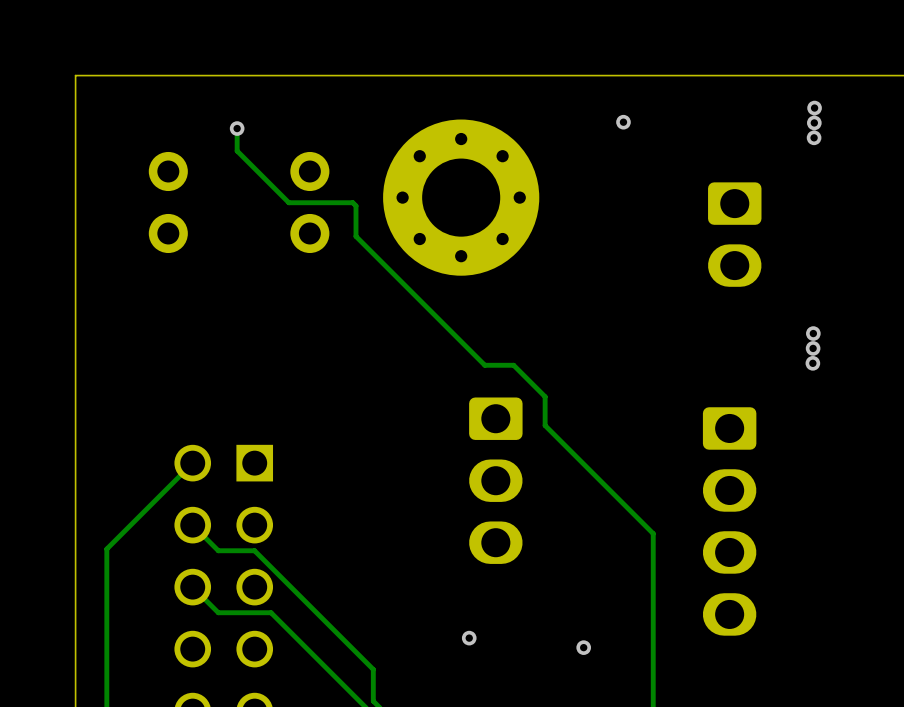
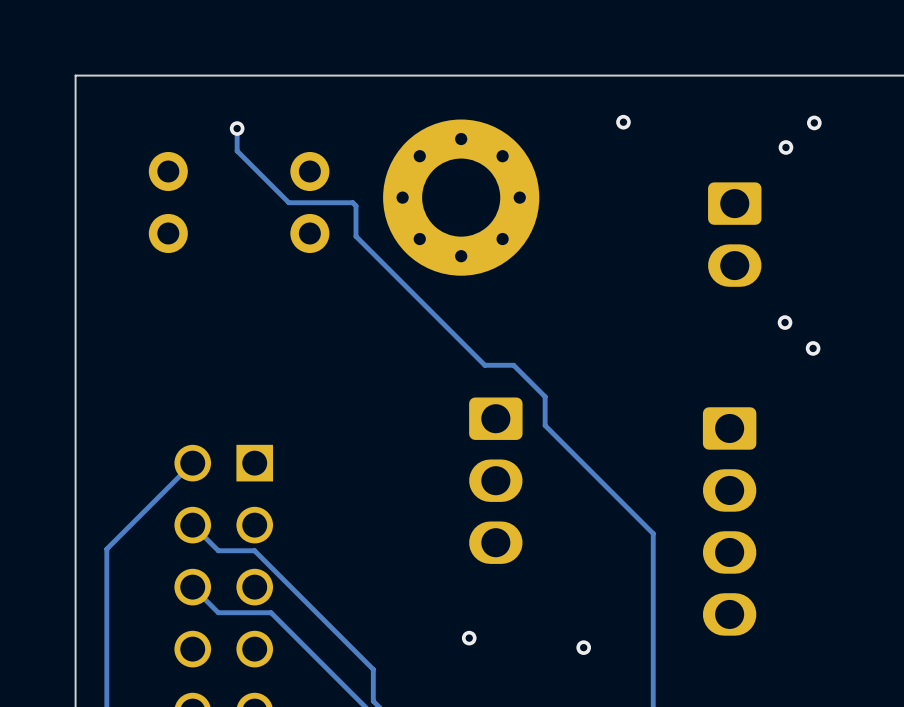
via: (814, 108) -> none
via: (814, 137) -> none
via: none -> (785, 147)
via: none -> (785, 322)
via: (813, 333) -> none
via: (812, 363) -> none

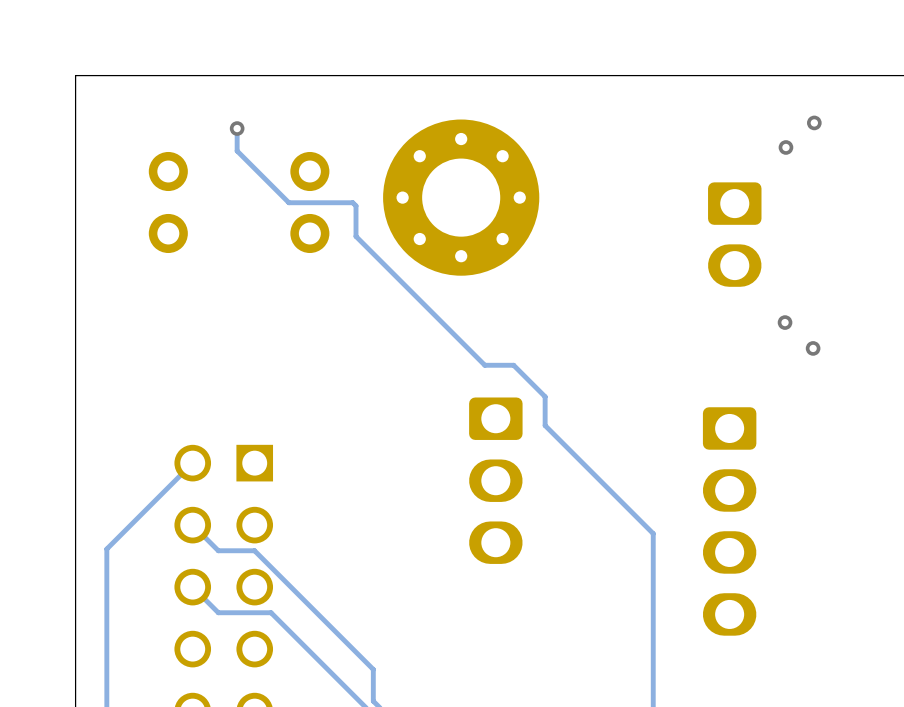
via: (623, 122) -> none
via: (469, 638) -> none
via: (583, 647) -> none

